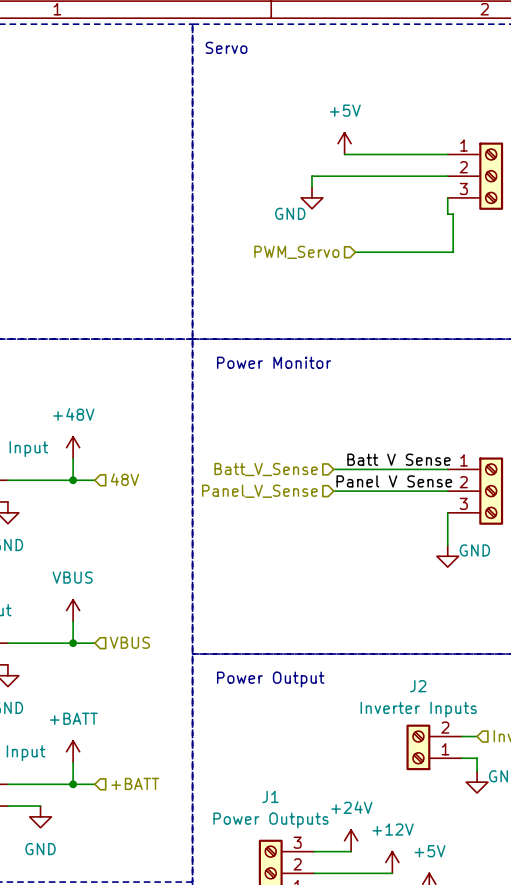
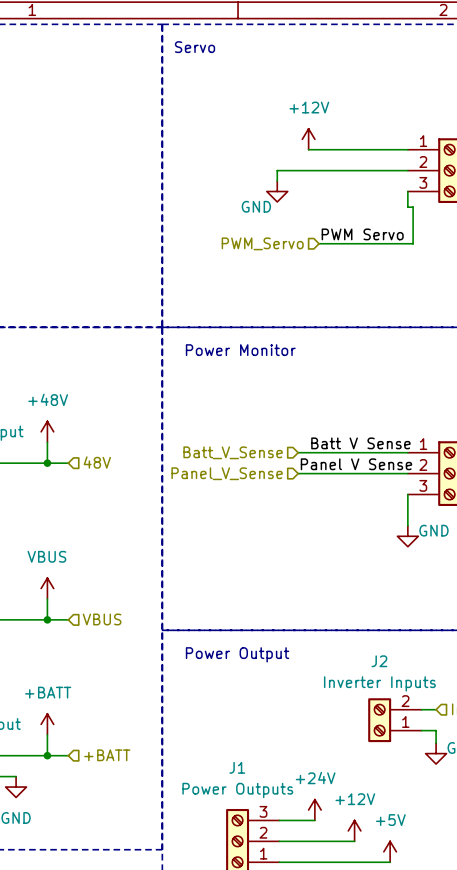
power symbol: +5V (344, 143) -> +12V (308, 139)
label: none -> PWM Servo (362, 234)

